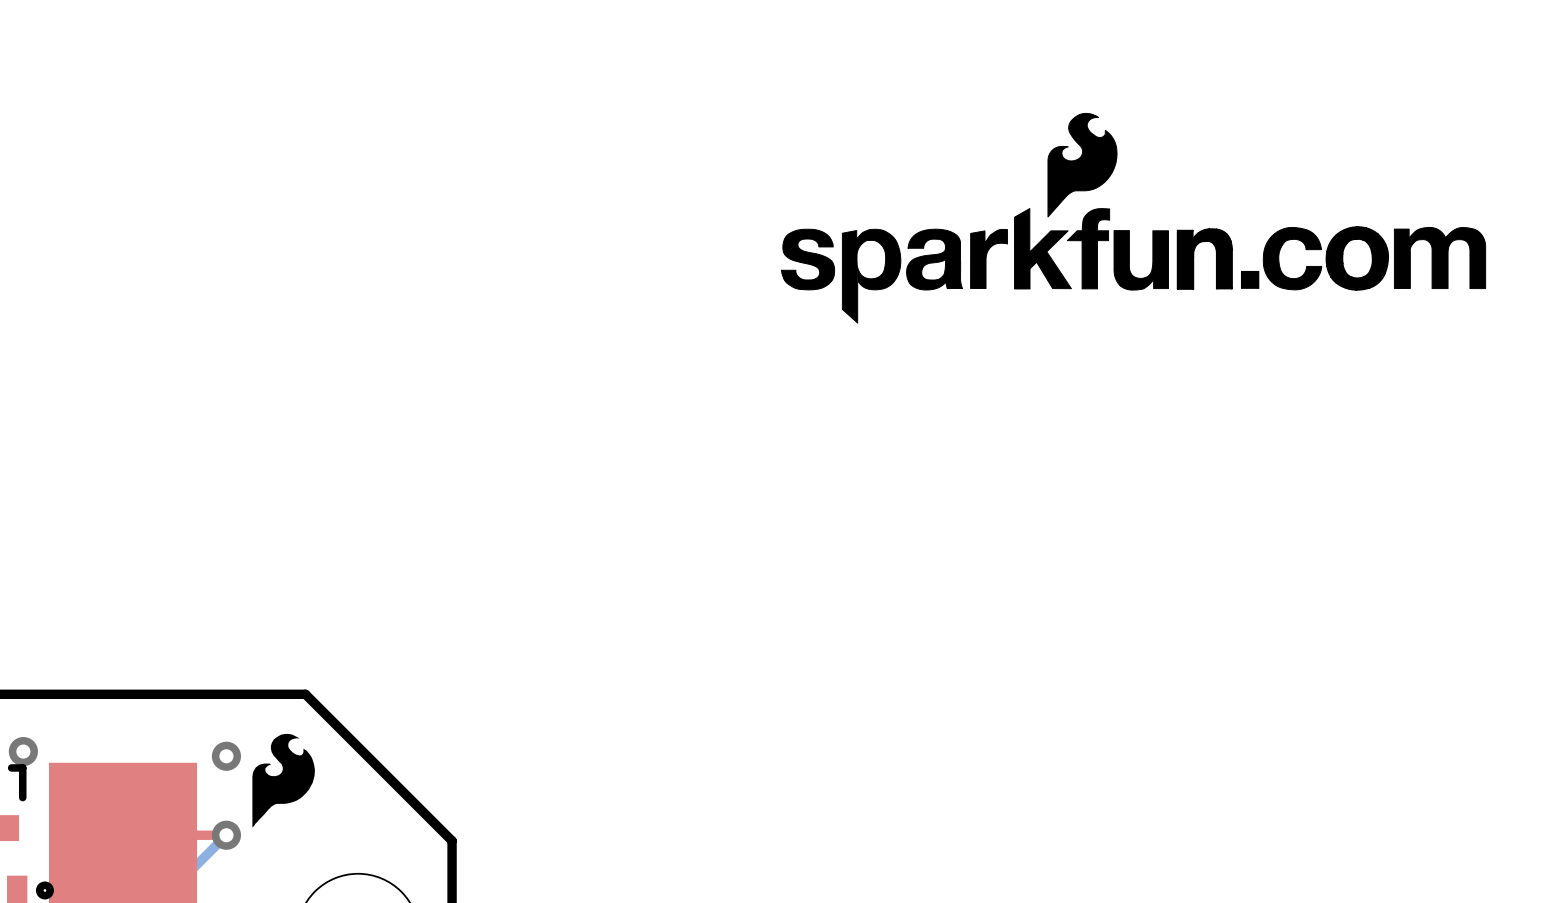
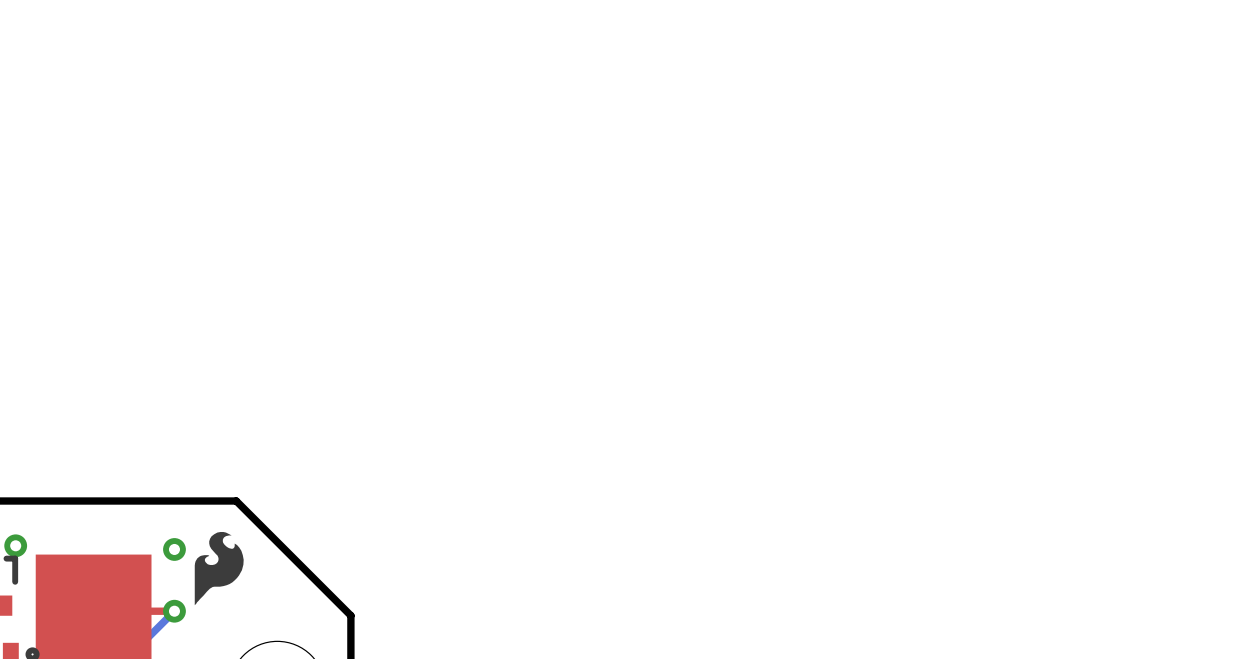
drawing: [781, 112, 1487, 324] -> none

